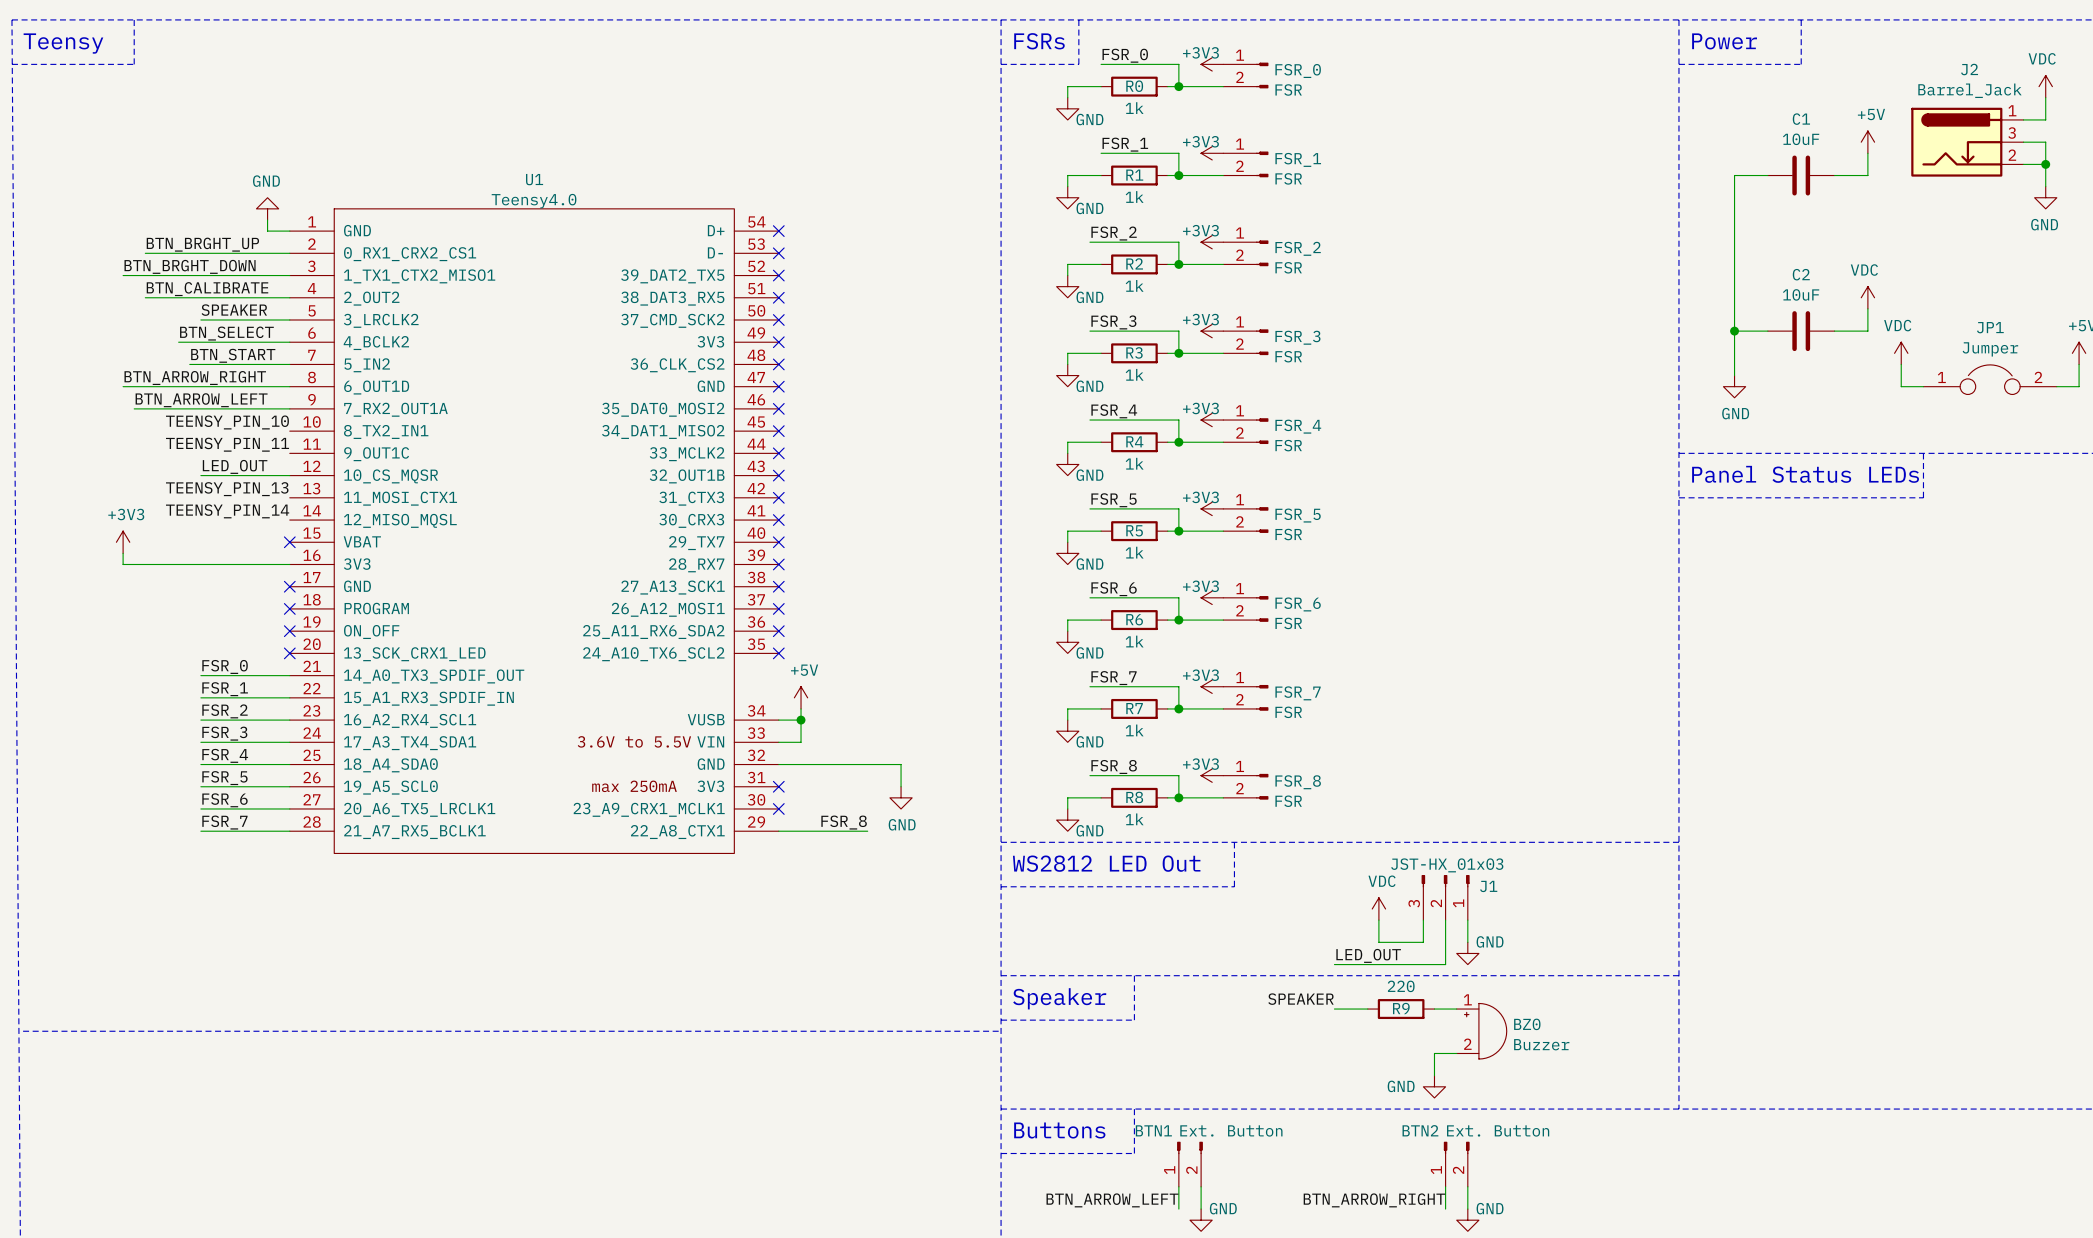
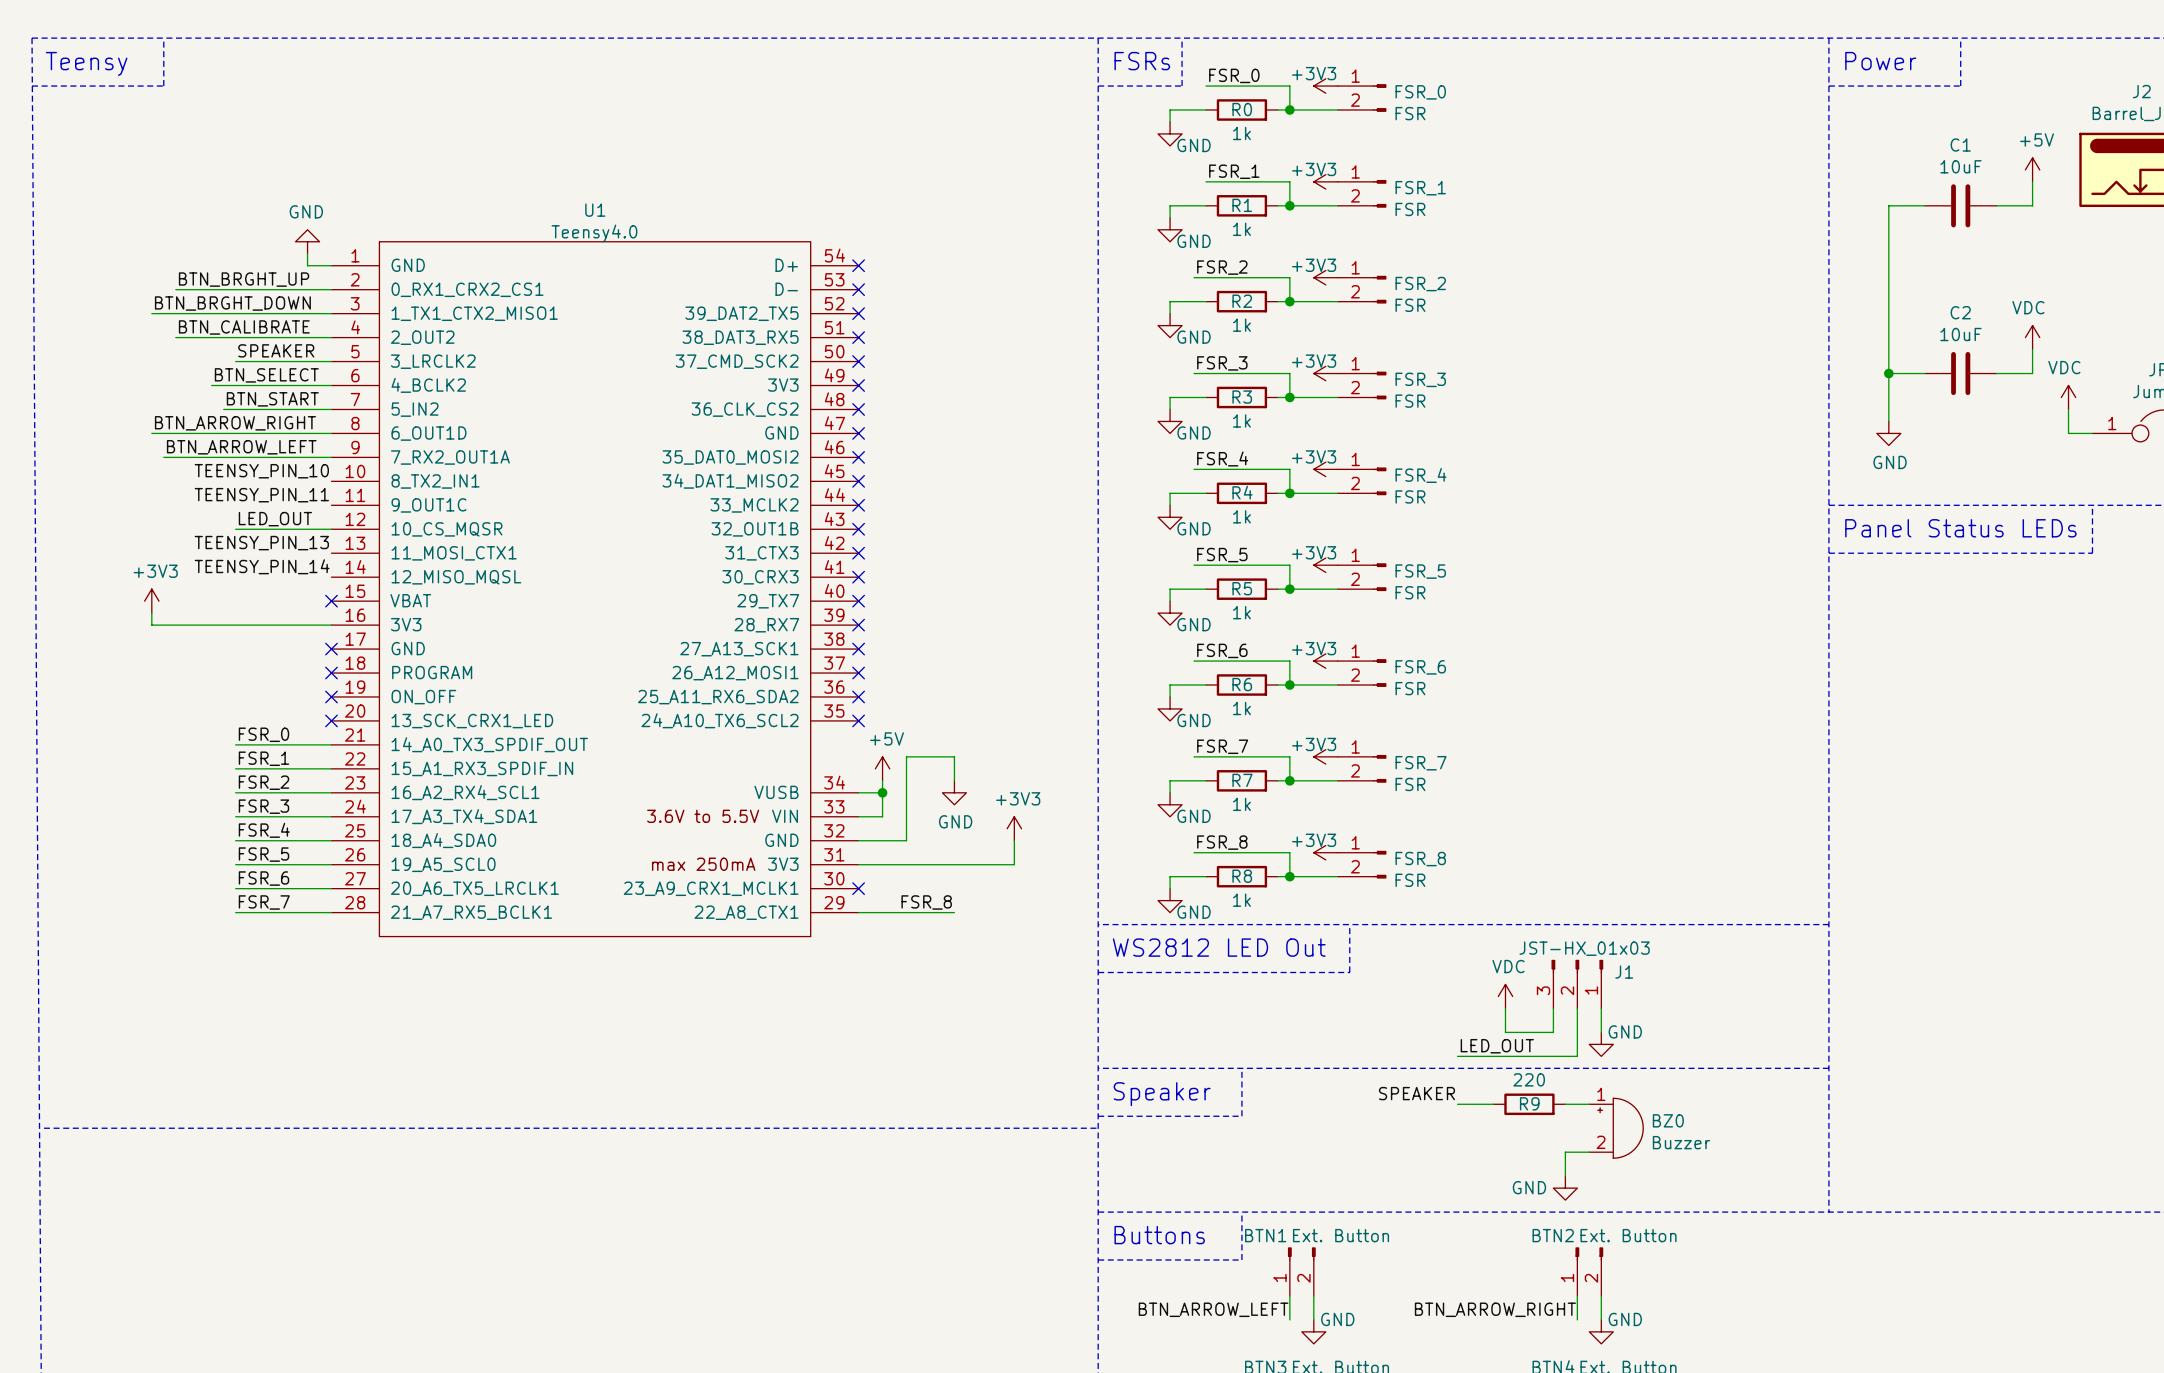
power symbol: none -> +3V3 (1014, 828)
wire: (823, 764) (901, 764) (901, 786) -> (906, 840) (906, 756) (954, 756) (954, 780)
wire: none -> (1014, 840) (1014, 864) (858, 864)
no-connect mark: (778, 786) -> none
power symbol position: GND (901, 797) -> GND (954, 792)

